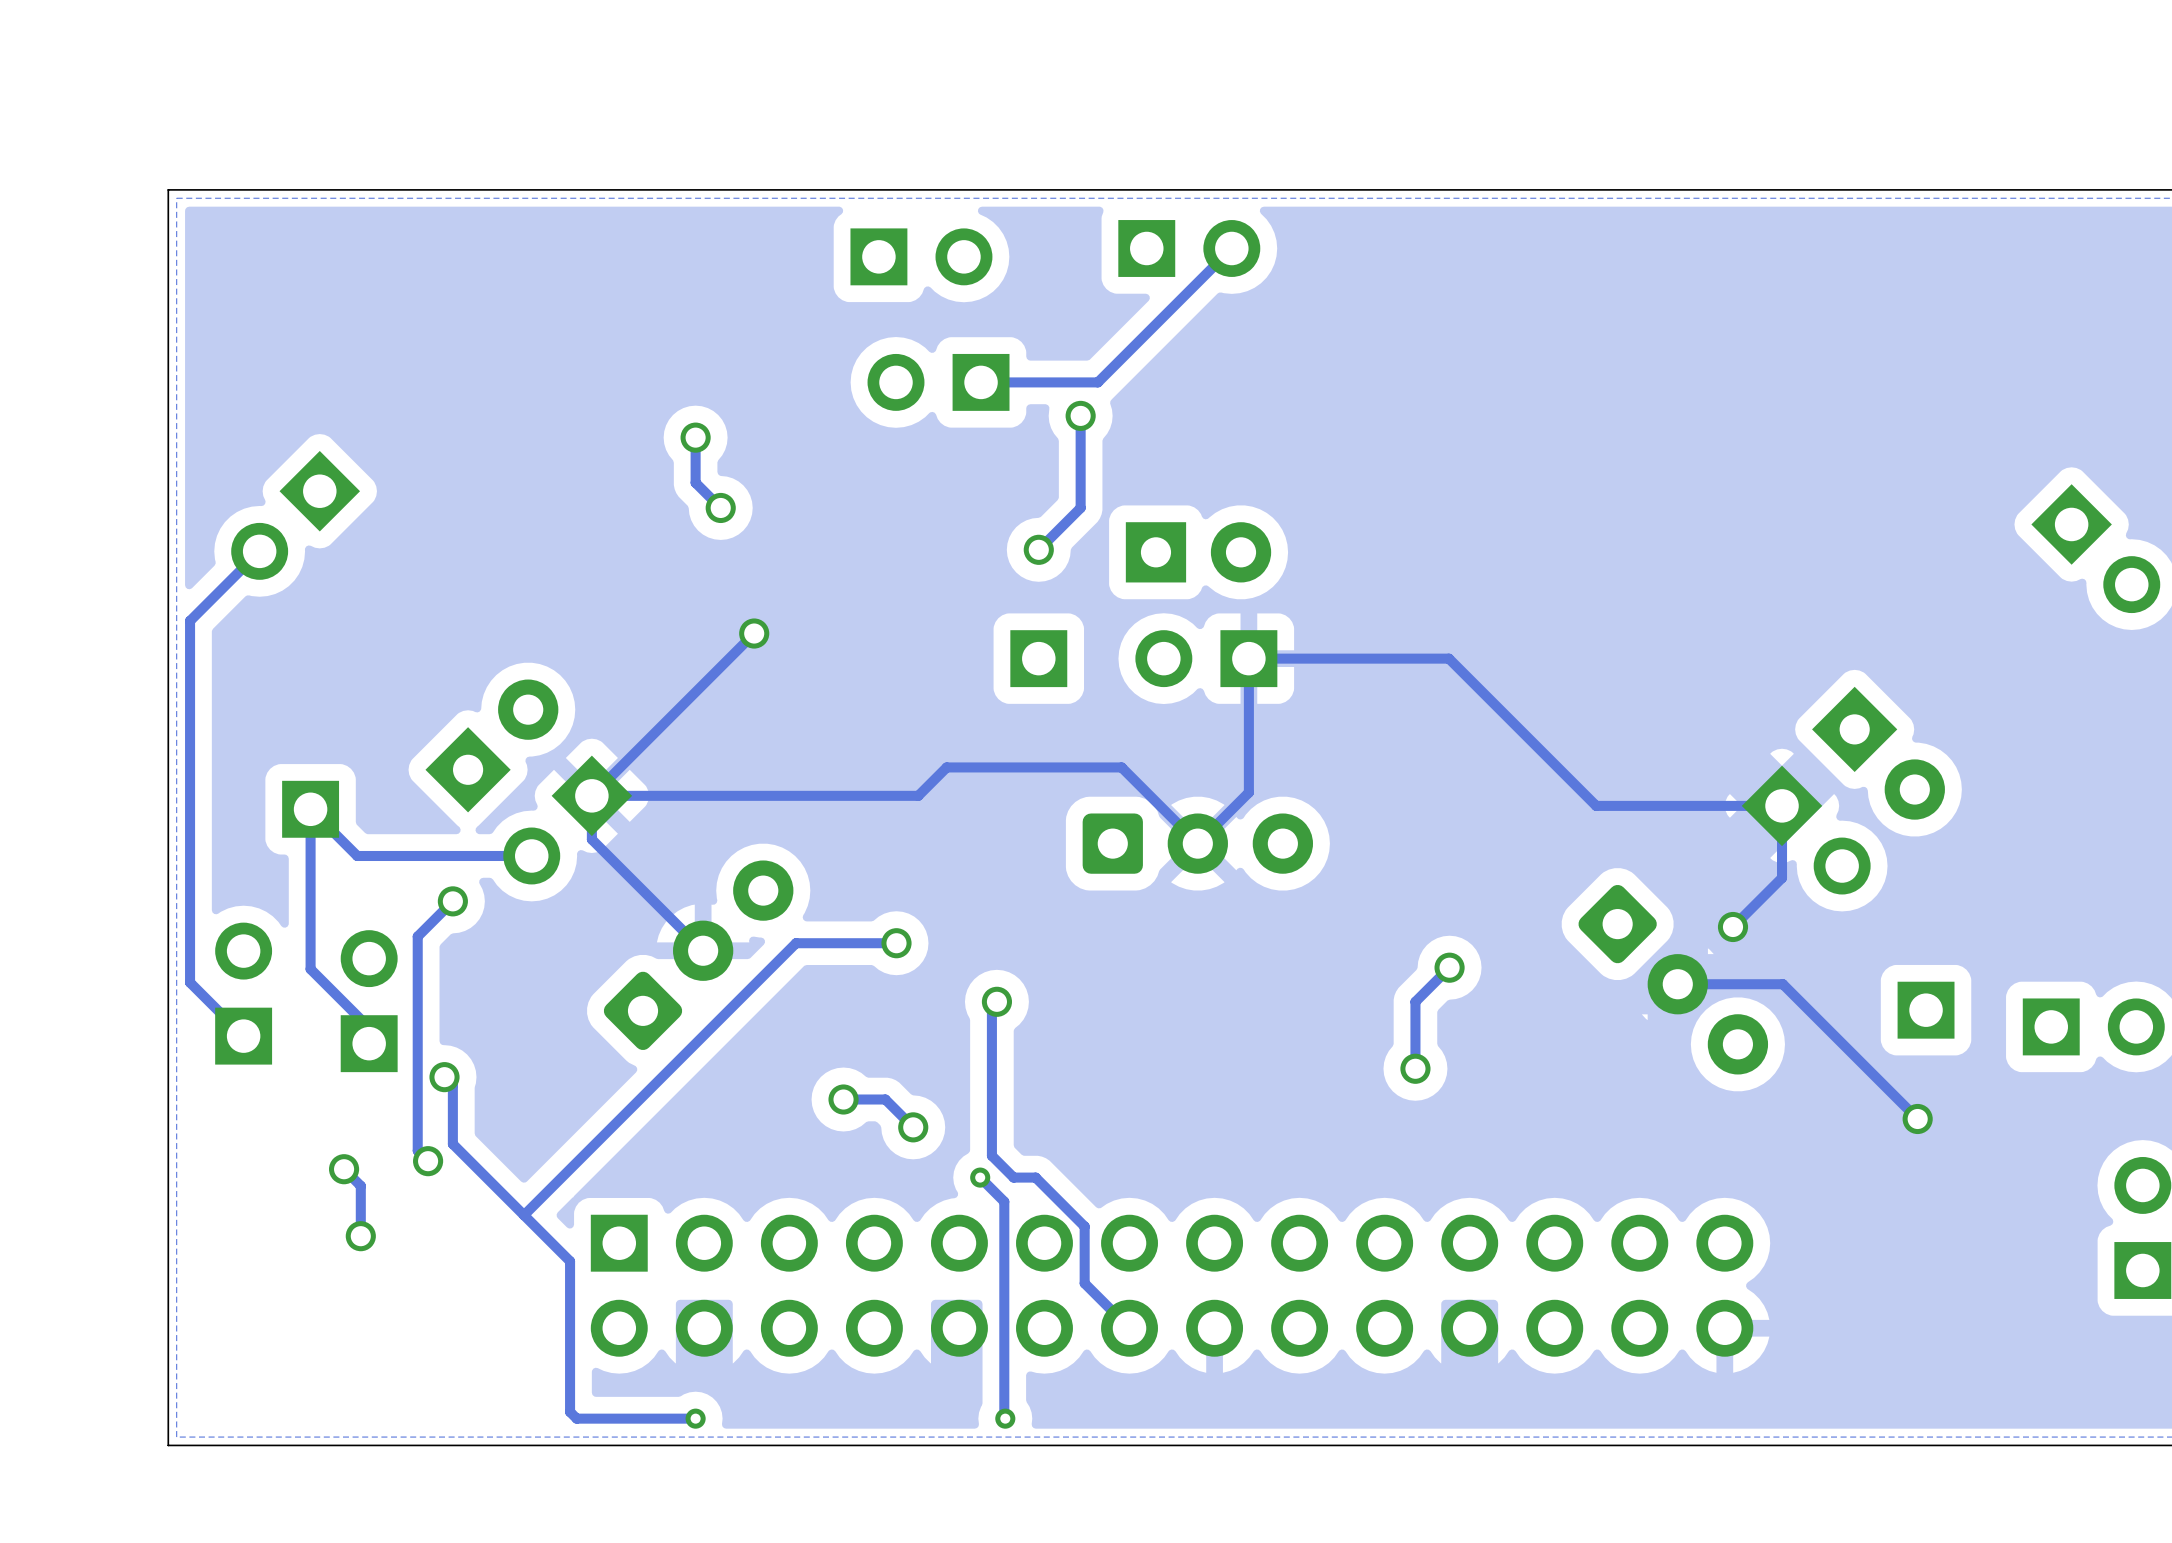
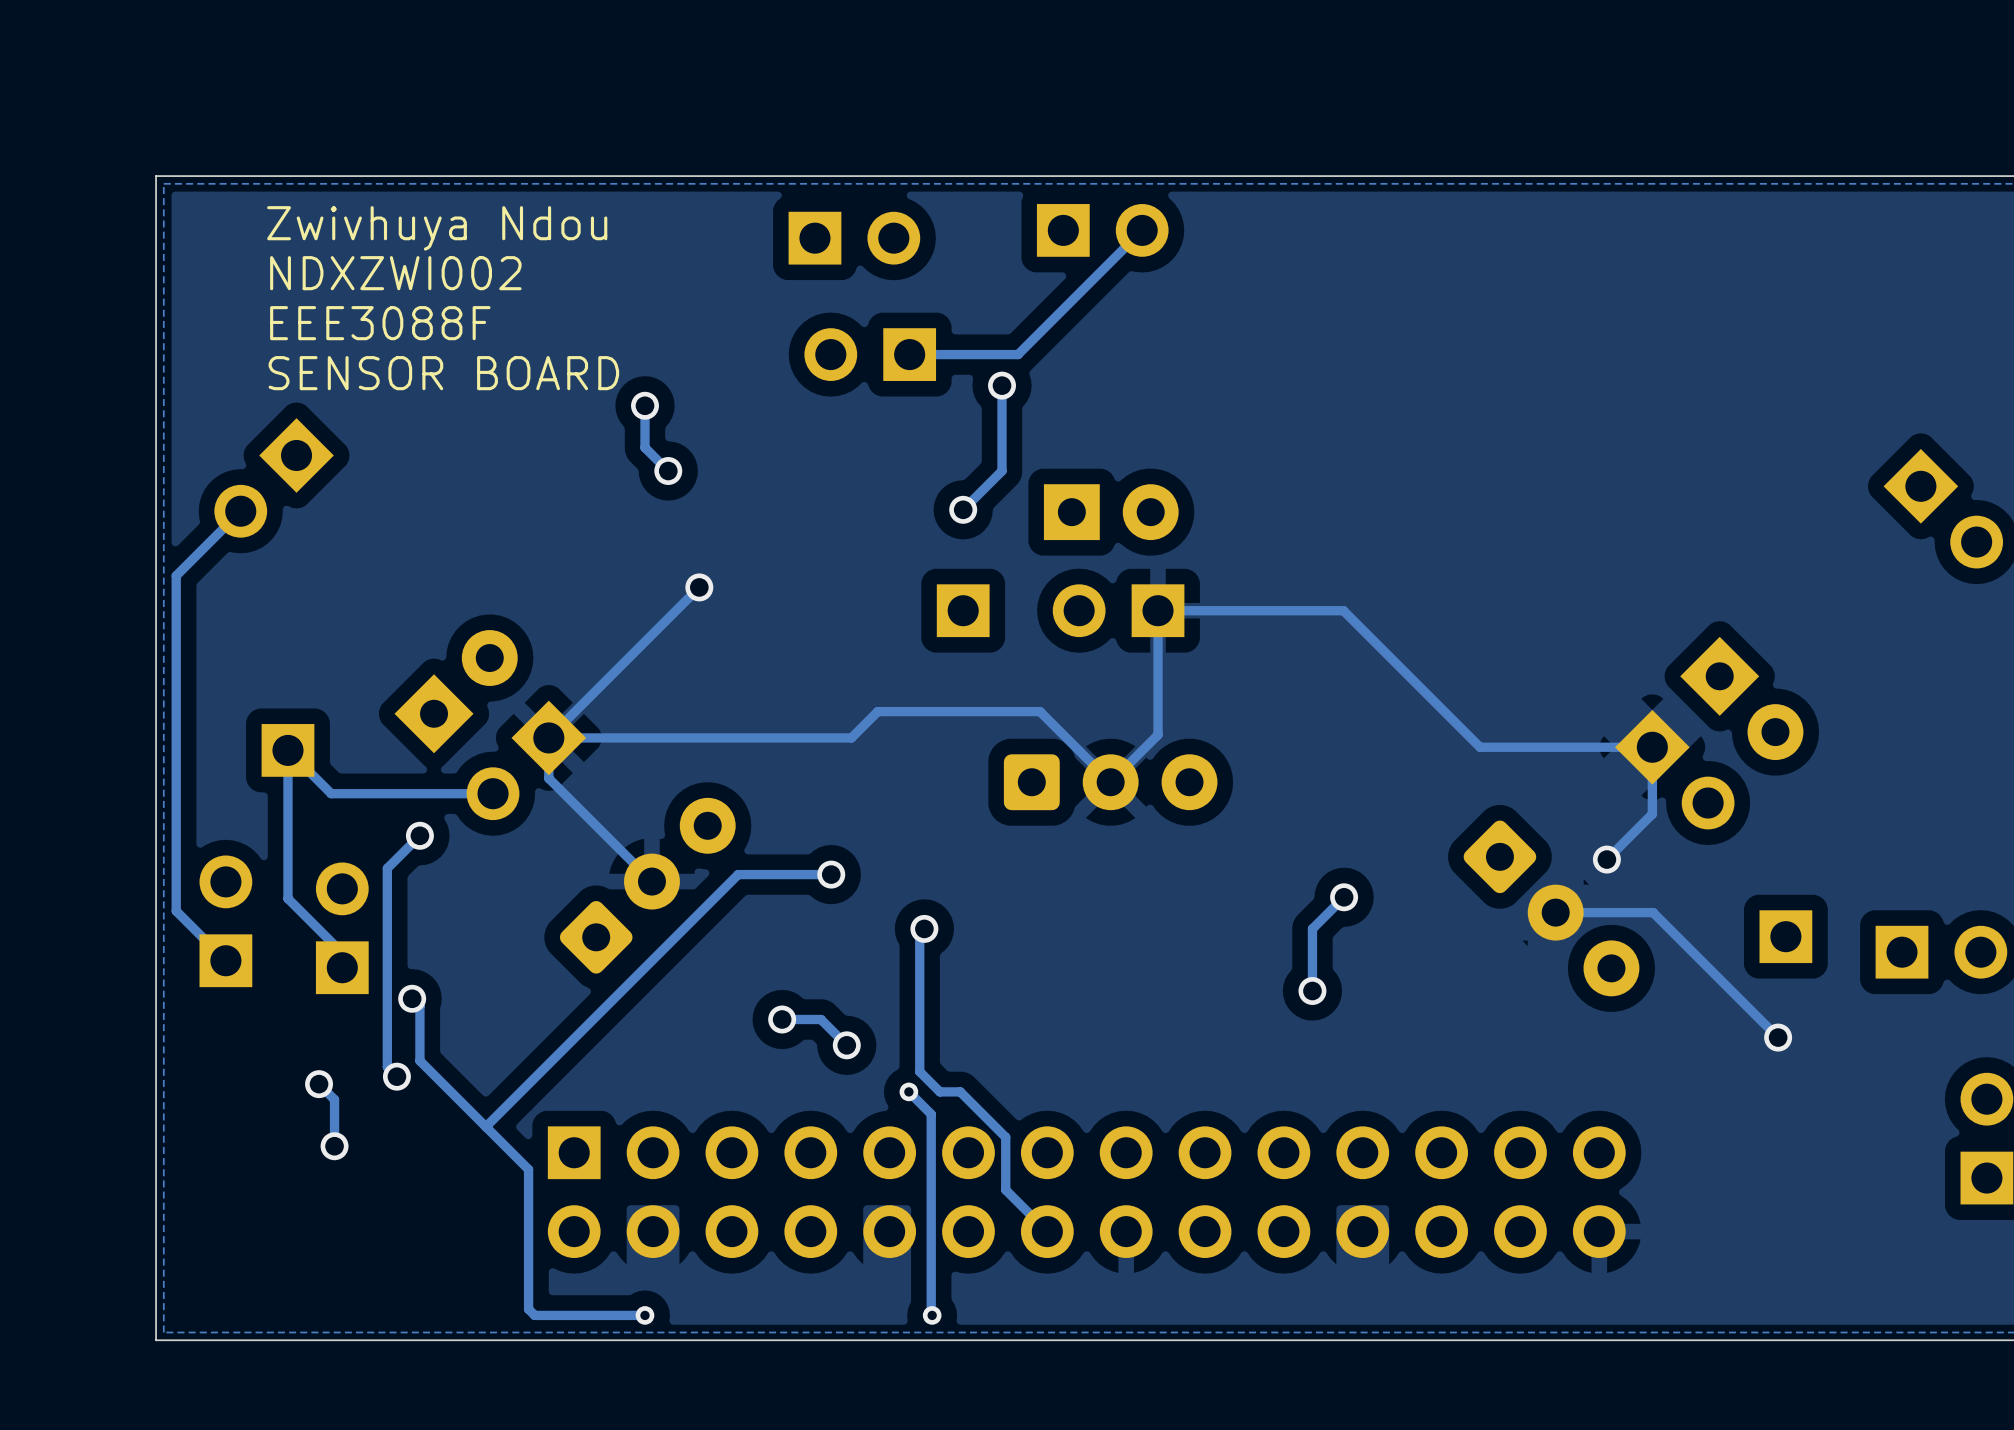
text: none -> Zwivhuya Ndou (437, 228)
text: none -> NDXZWI002 (395, 273)
text: none -> EEE3088F (380, 323)
text: none -> SENSOR BOARD (443, 373)

